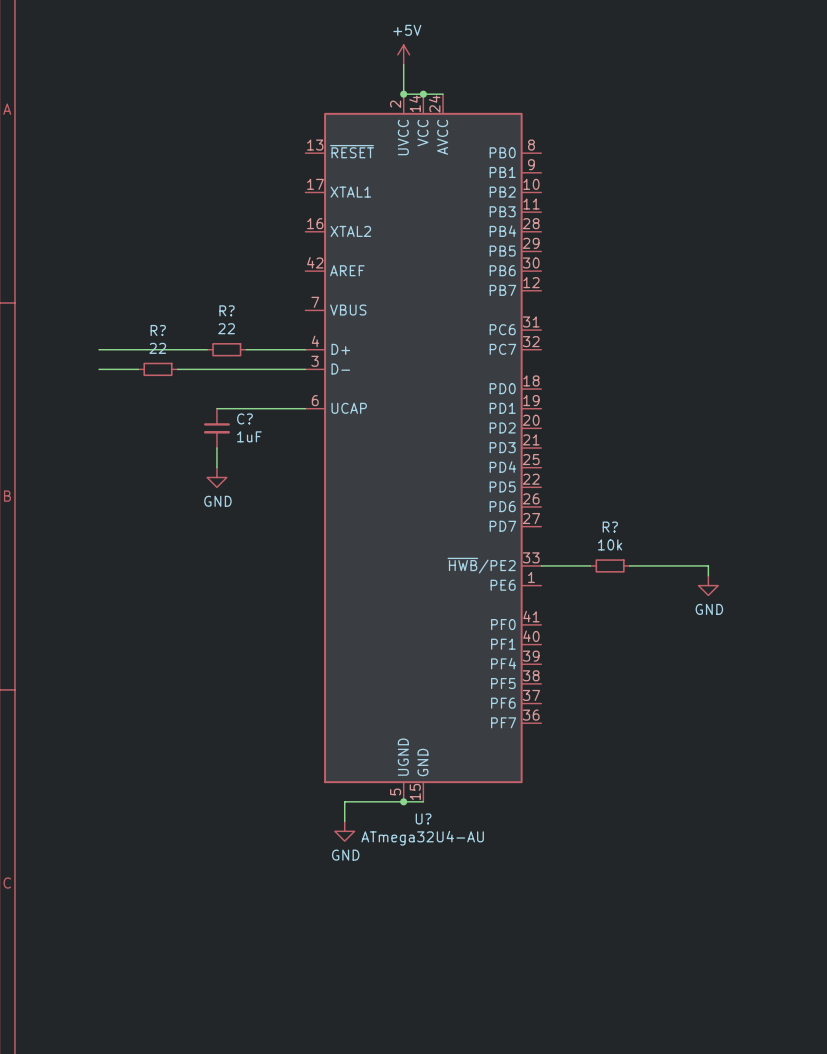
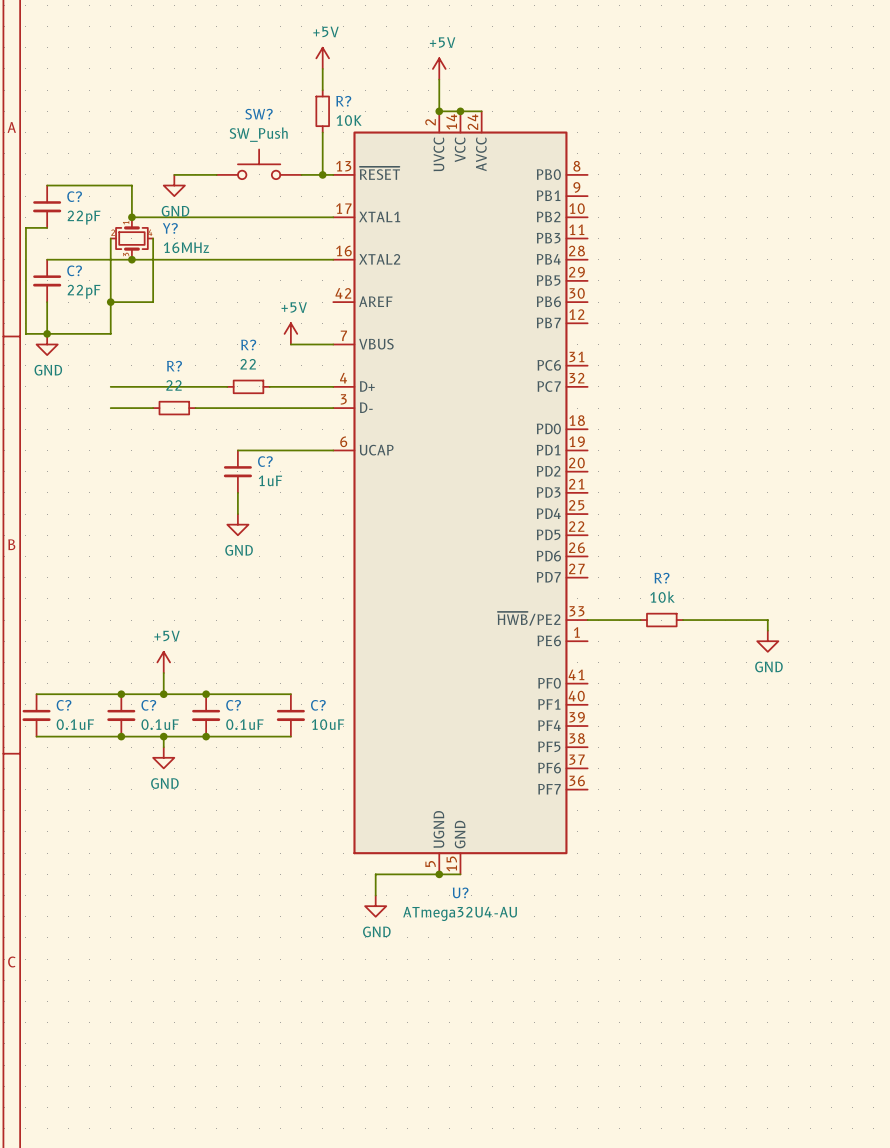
power symbol: none -> +5V (322, 58)
wire: none -> (322, 68) (322, 90)
R?: none -> 10K (322, 111)
wire: none -> (322, 132) (322, 174)
SW?: none -> SW_Push (259, 164)
wire: none -> (174, 174) (216, 174)
wire: none -> (301, 174) (333, 174)
junction: none -> (322, 174)
wire: none -> (47, 185) (131, 185) (131, 217) (333, 217)
power symbol: none -> GND (174, 185)
C?: none -> 22pF (47, 206)
junction: none -> (131, 217)
wire: none -> (47, 227) (25, 227) (25, 333) (110, 333) (110, 238)
Y?: none -> 16MHz (131, 238)
wire: none -> (153, 238) (153, 302) (110, 302)
wire: none -> (47, 259) (333, 259)
junction: none -> (131, 259)
C?: none -> 22pF (47, 280)
wire: none -> (47, 302) (47, 333)
junction: none -> (110, 302)
junction: none -> (47, 333)
power symbol: none -> +5V (290, 333)
power symbol: none -> GND (47, 344)
wire: none -> (290, 344) (333, 344)
power symbol: none -> +5V (163, 662)
wire: none -> (163, 673) (163, 694)
wire: none -> (36, 694) (290, 694)
junction: none -> (121, 694)
junction: none -> (163, 694)
junction: none -> (206, 694)
C?: none -> 0.1uF (36, 715)
C?: none -> 0.1uF (121, 715)
C?: none -> 0.1uF (206, 715)
C?: none -> 10uF (290, 715)
wire: none -> (36, 736) (290, 736)
junction: none -> (121, 736)
wire: none -> (163, 736) (163, 747)
junction: none -> (163, 736)
junction: none -> (206, 736)
power symbol: none -> GND (163, 757)

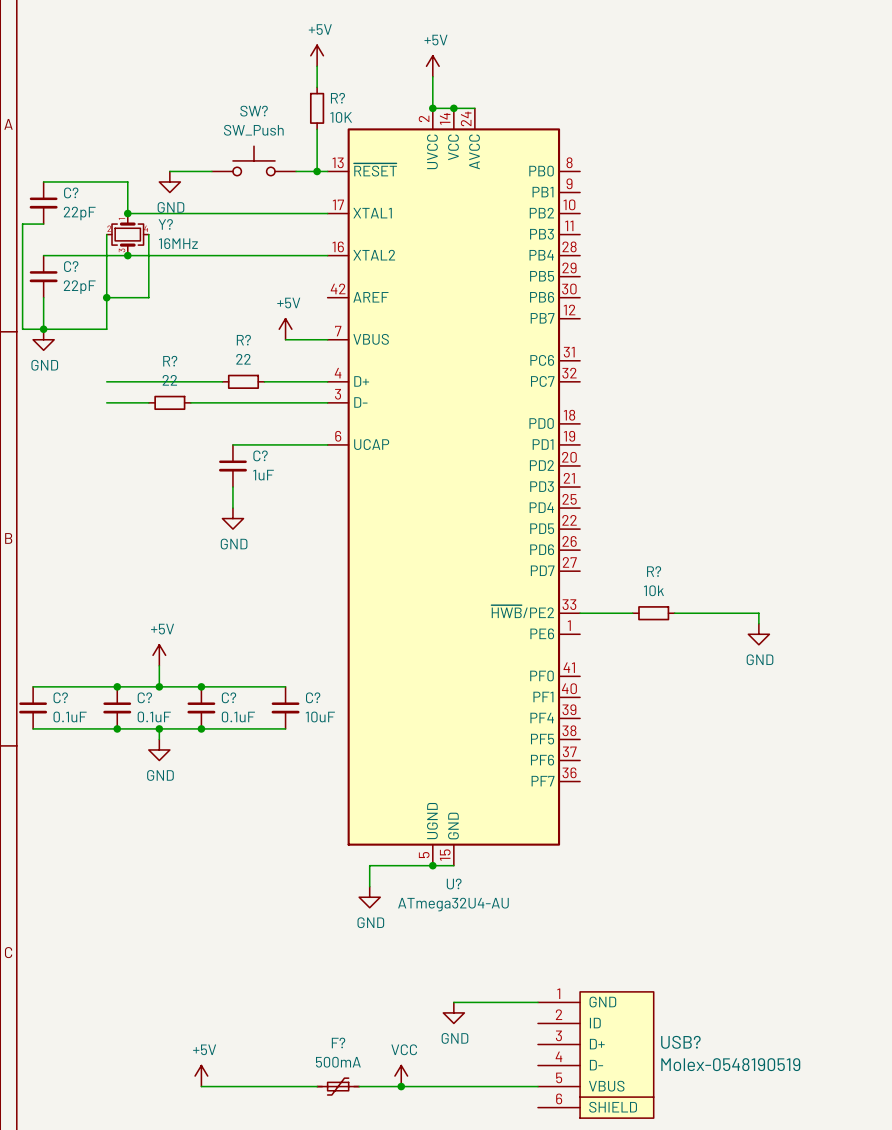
wire: none -> (453, 1002) (538, 1002)
power symbol: none -> GND (453, 1012)
USB?: none -> Molex-0548190519 (595, 1055)
power symbol: none -> +5V (201, 1076)
power symbol: none -> VCC (401, 1076)
wire: none -> (201, 1086) (317, 1086)
F?: none -> 500mA (338, 1086)
wire: none -> (359, 1086) (538, 1086)
junction: none -> (401, 1086)

